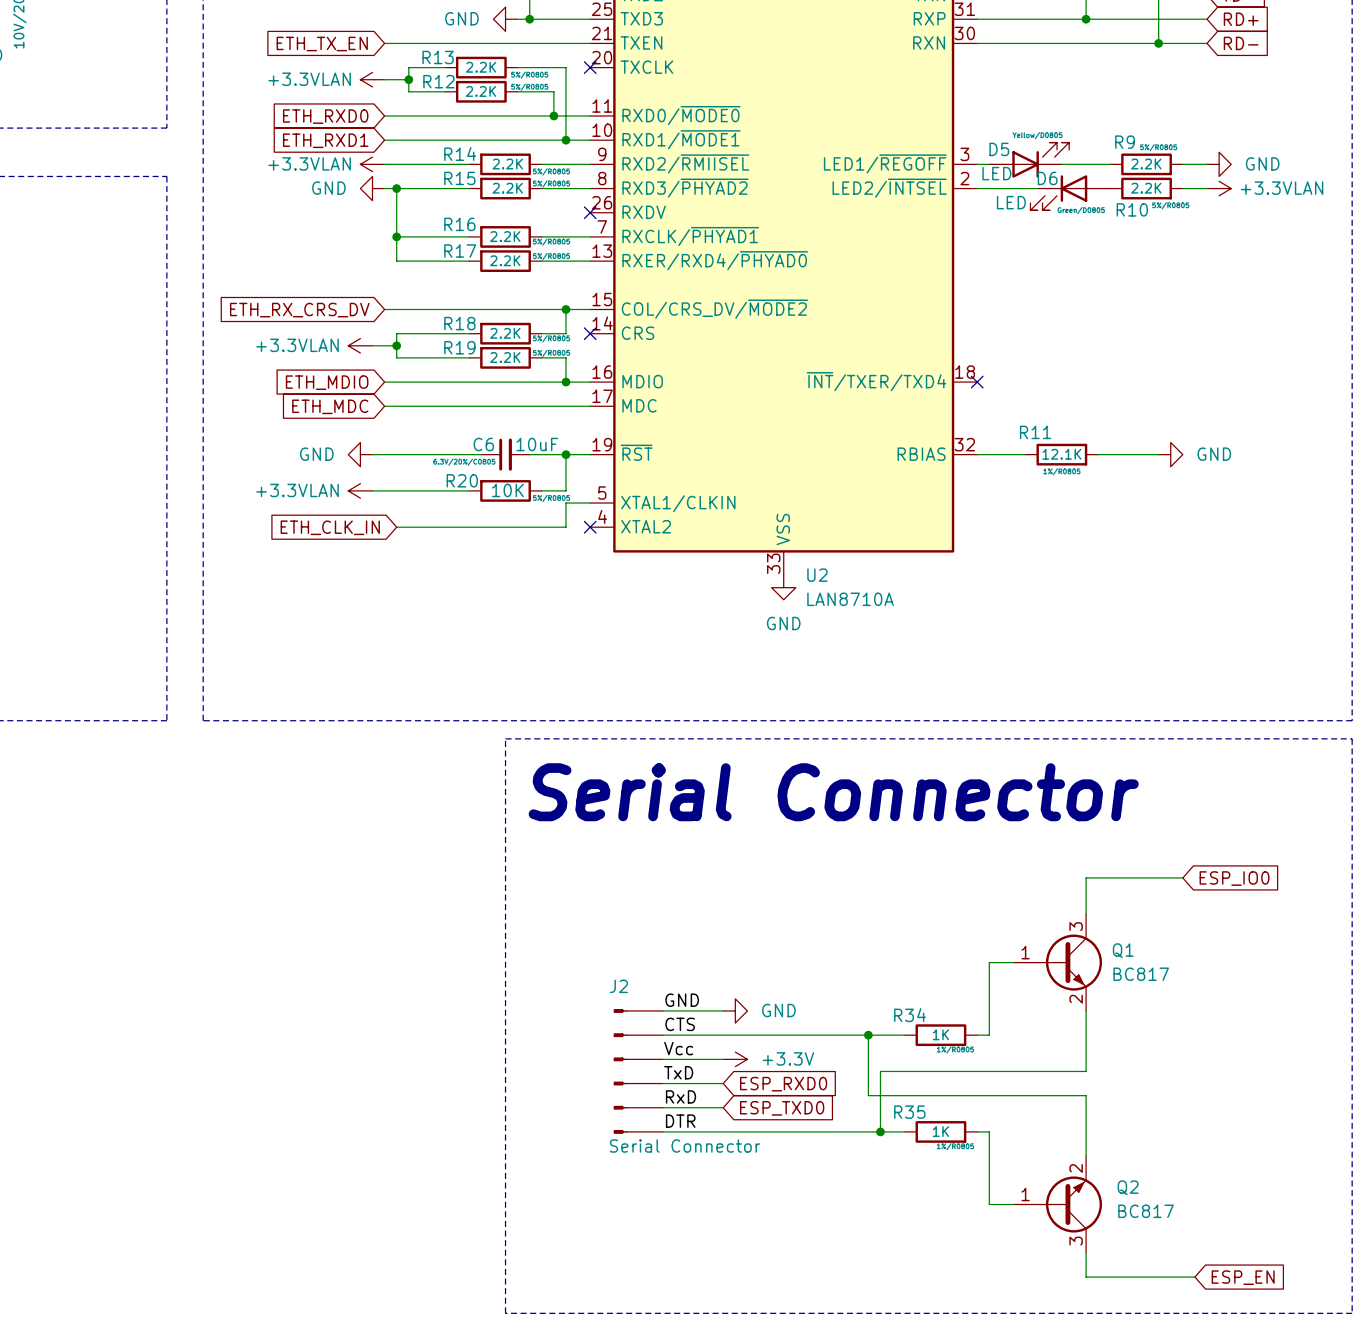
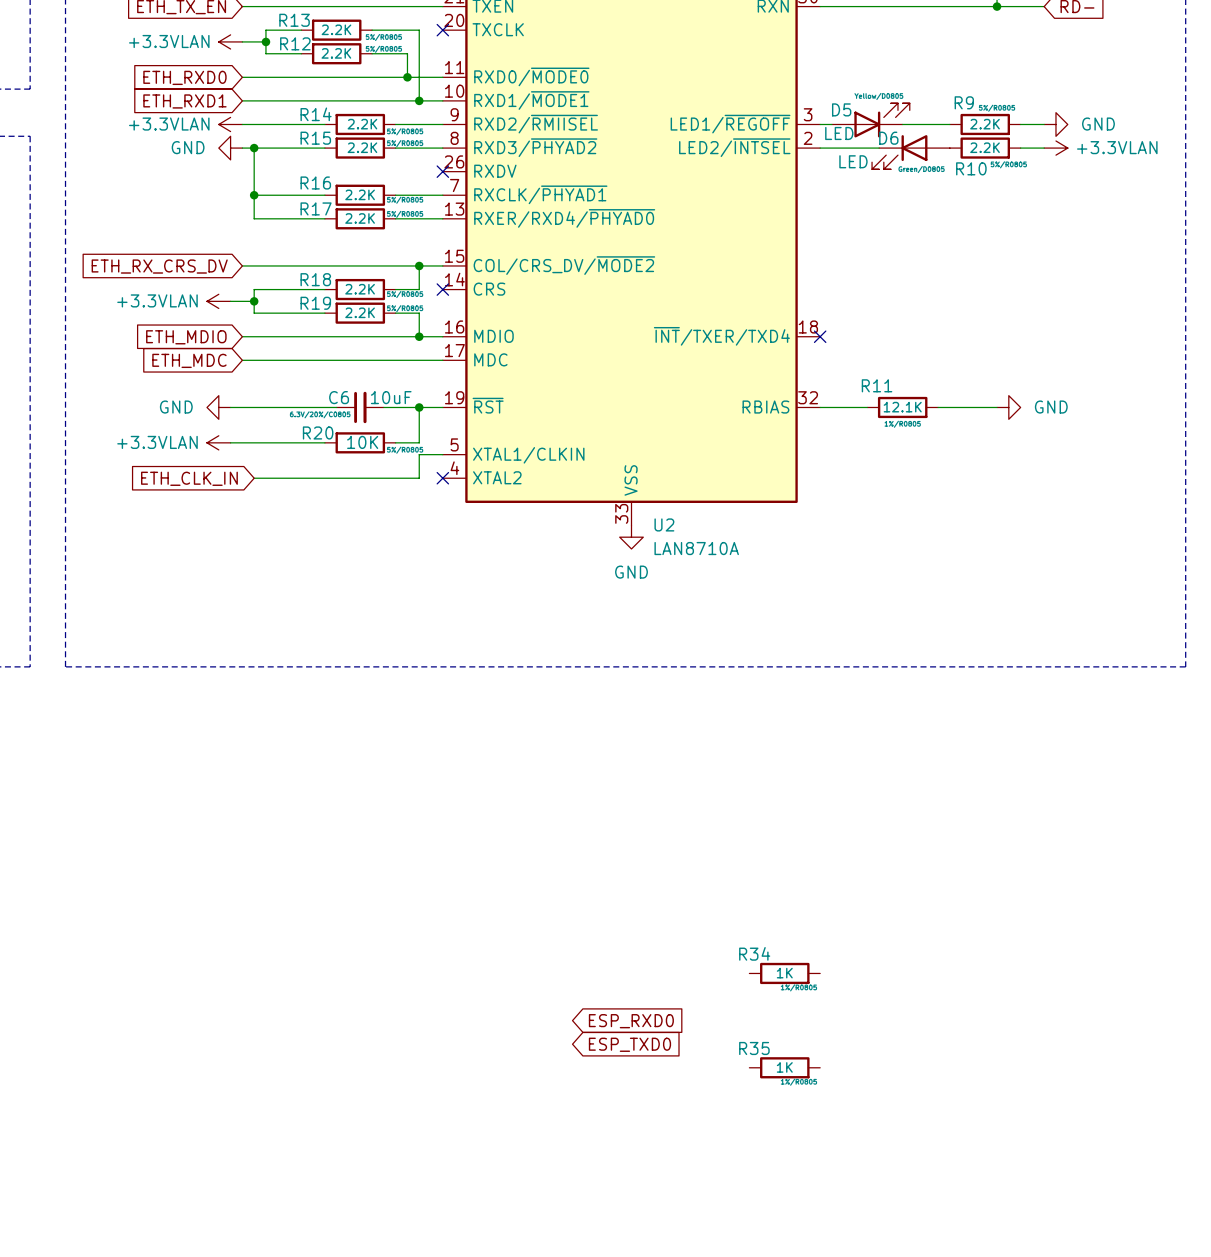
line: (505, 738) (1352, 738) (1352, 1313) (505, 1313) (505, 738) -> none
text: Serial Connector (833, 792) -> none
wire: (1182, 877) (1086, 877) (1086, 914) -> none
global label: ESP_IO0 (1234, 878) -> none
wire: (1013, 962) (989, 962) (989, 1035) (977, 1035) -> none
Q1: BC817 (1057, 962) -> none
label: GND (682, 1000) -> none
wire: (662, 1010) (723, 1010) -> none
power symbol: GND (735, 1010) -> none
wire: (1086, 1010) (1086, 1071) (880, 1071) (880, 1131) -> none
label: CTS (680, 1024) -> none
wire: (662, 1035) (904, 1035) -> none
wire: (868, 1035) (868, 1095) (1086, 1095) (1086, 1156) -> none
junction: (868, 1035) -> none
label: Vcc (678, 1048) -> none
wire: (662, 1059) (723, 1059) -> none
power symbol: +3.3V (735, 1059) -> none
J2: Serial Connector (638, 1071) -> none
label: TxD (678, 1072) -> none
wire: (662, 1083) (723, 1083) -> none
label: RxD (681, 1096) -> none
wire: (662, 1107) (723, 1107) -> none
label: DTR (680, 1121) -> none
wire: (662, 1131) (904, 1131) -> none
junction: (880, 1131) -> none
wire: (977, 1131) (989, 1131) (989, 1204) (1013, 1204) -> none
Q2: BC817 (1057, 1204) -> none
wire: (1086, 1252) (1086, 1277) (1194, 1277) -> none
global label: ESP_EN (1243, 1277) -> none

